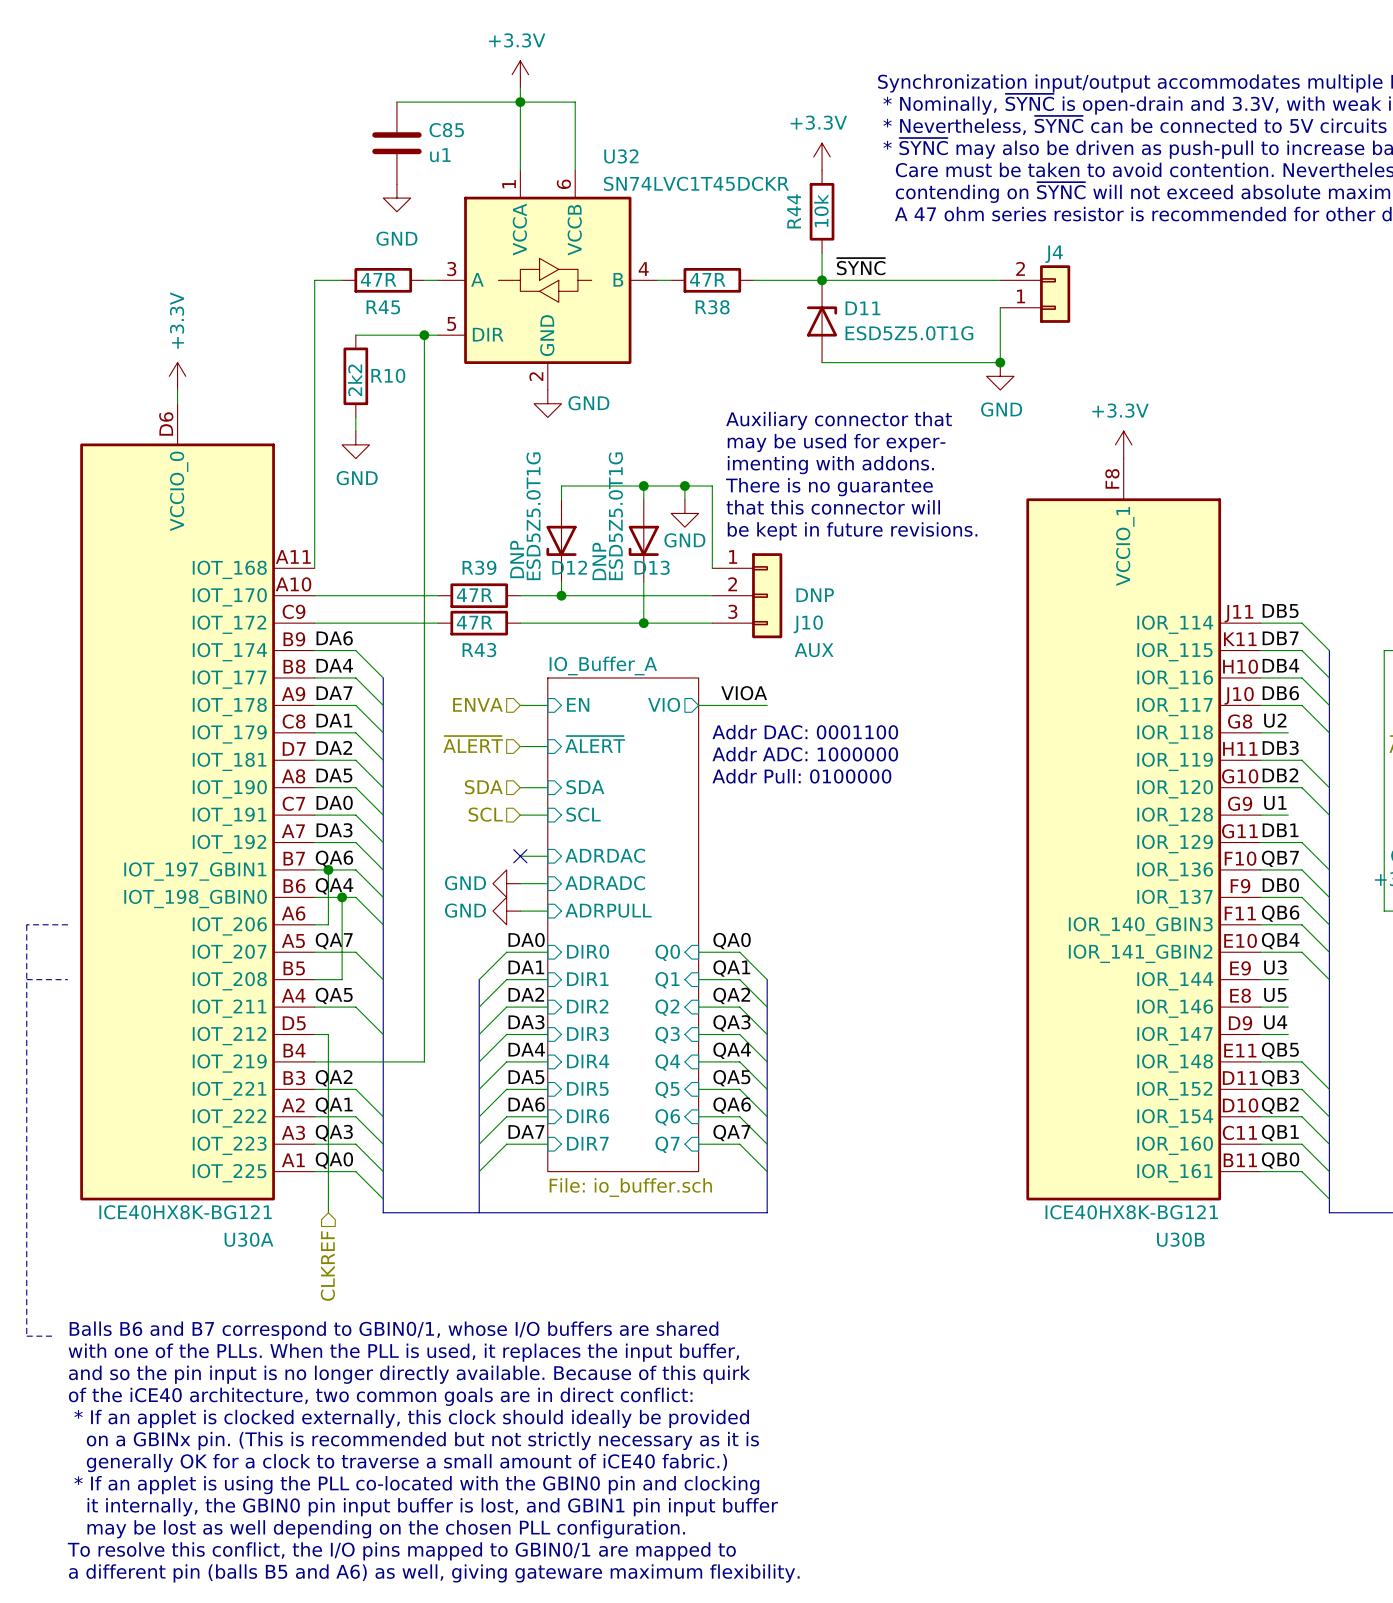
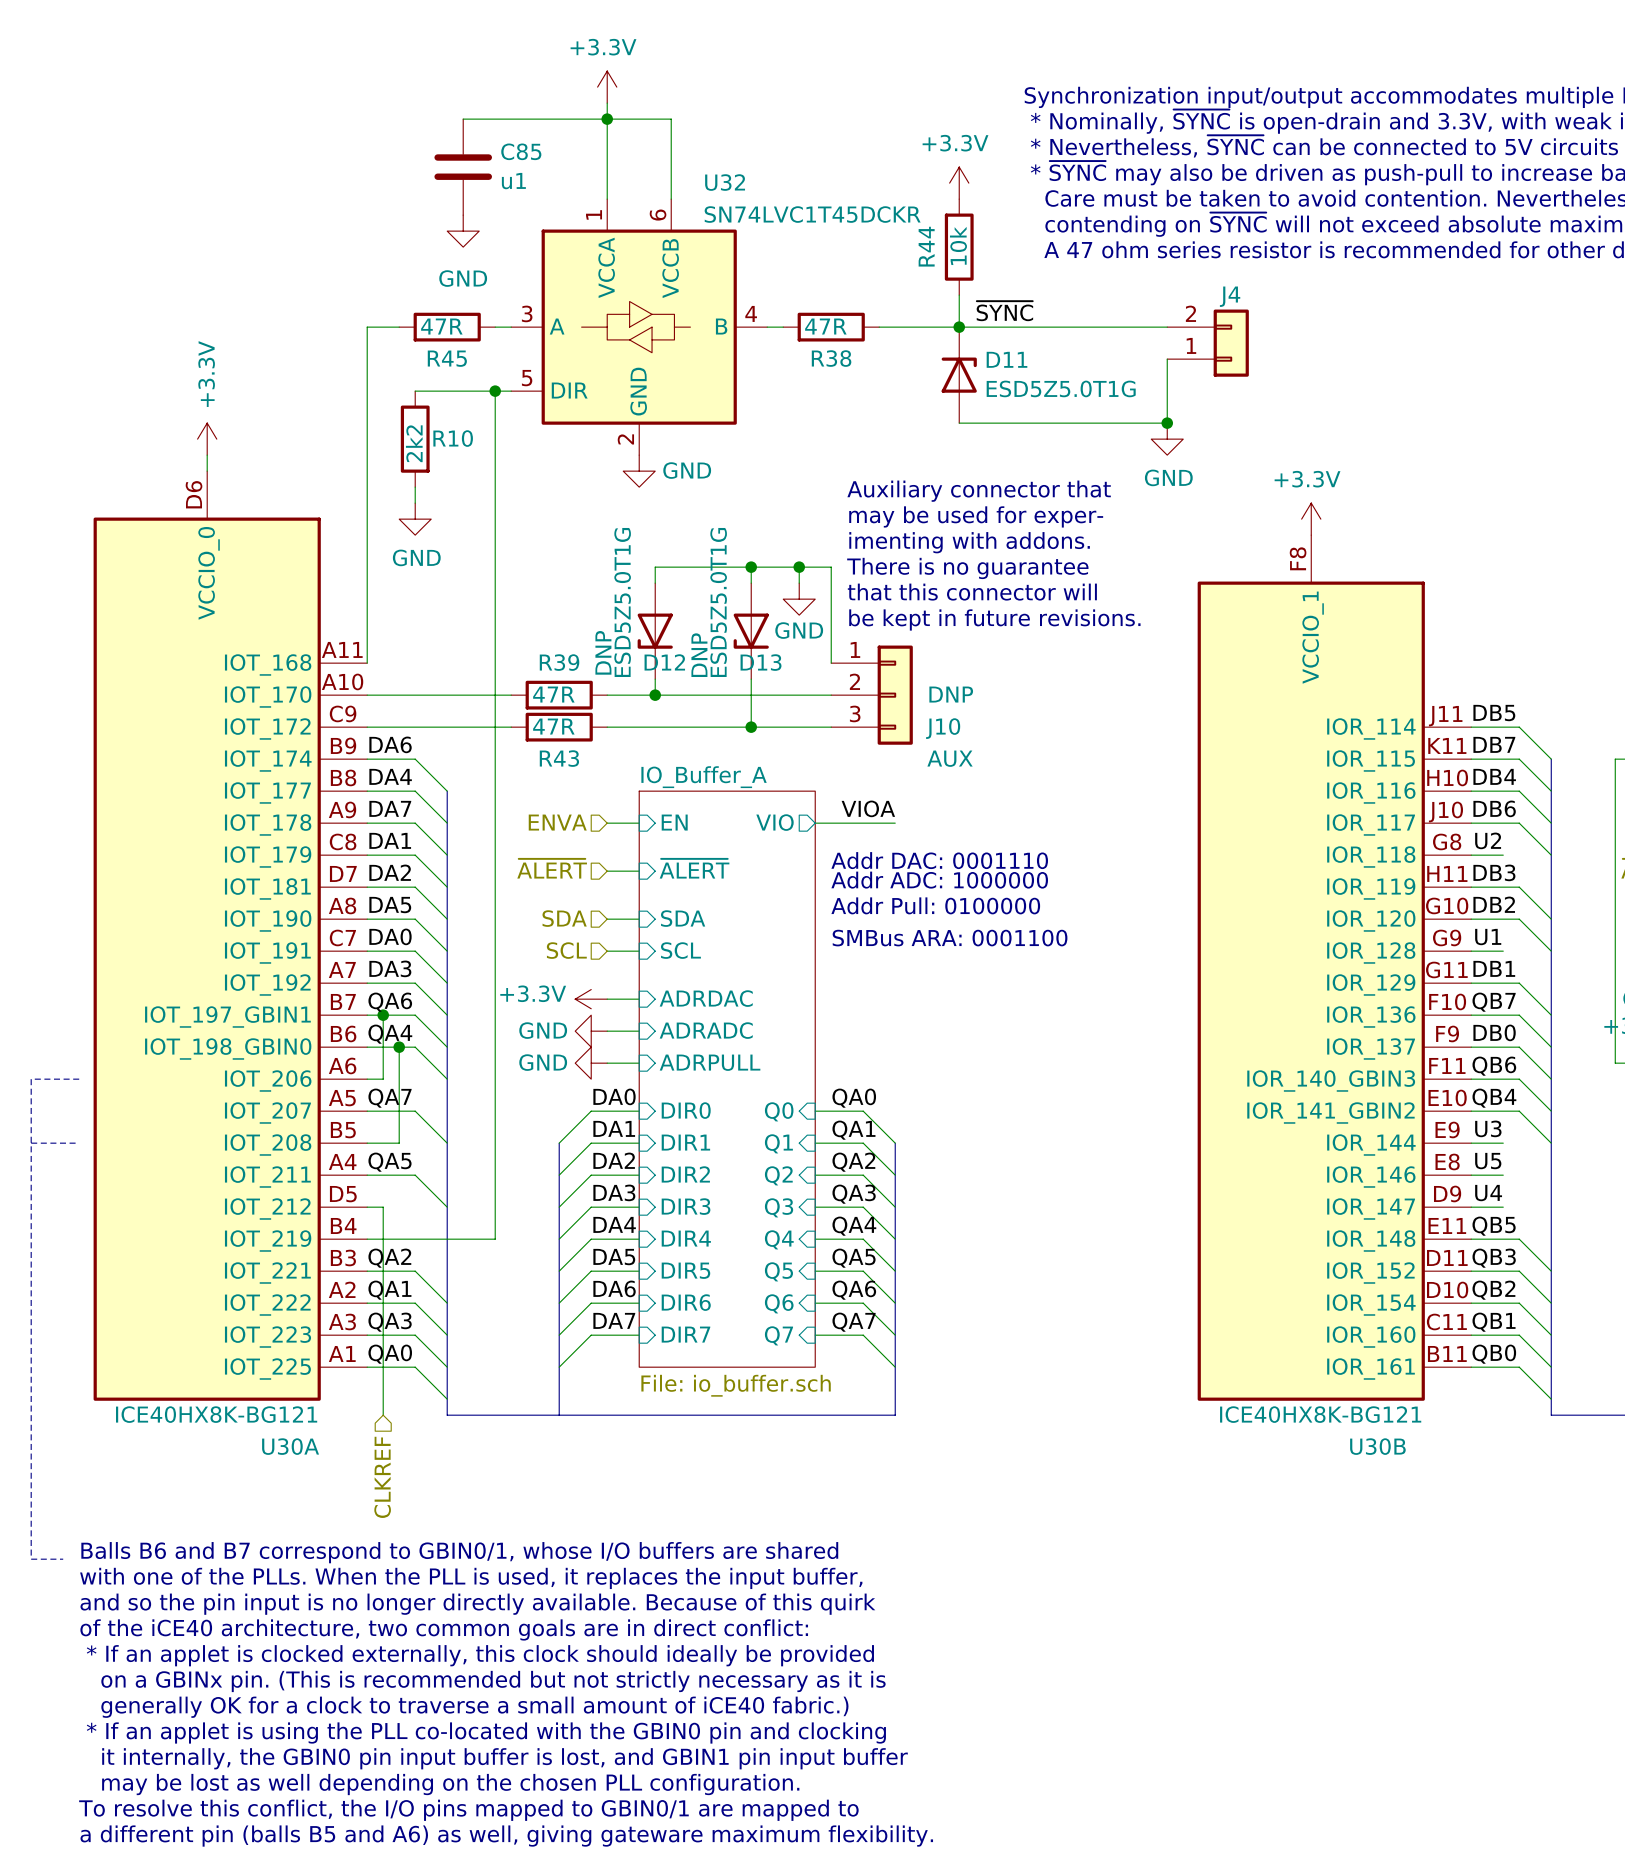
text: Addr DAC: 0001100 (805, 732) -> Addr DAC: 0001110 (939, 860)
text: none -> SMBus ARA: 0001100 (950, 938)
power symbol: none -> +3.3V (591, 999)
no-connect mark: (520, 856) -> none

